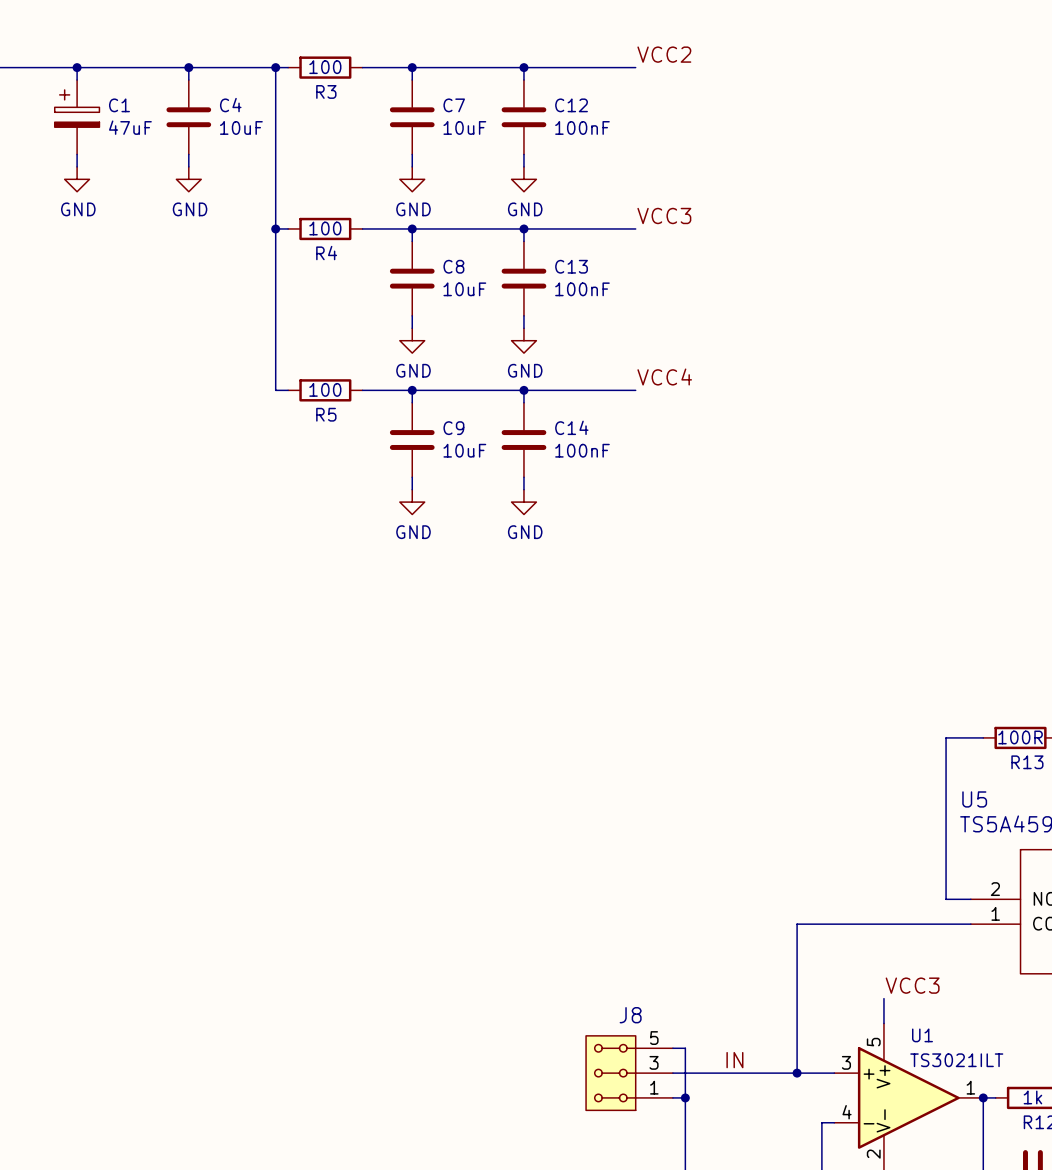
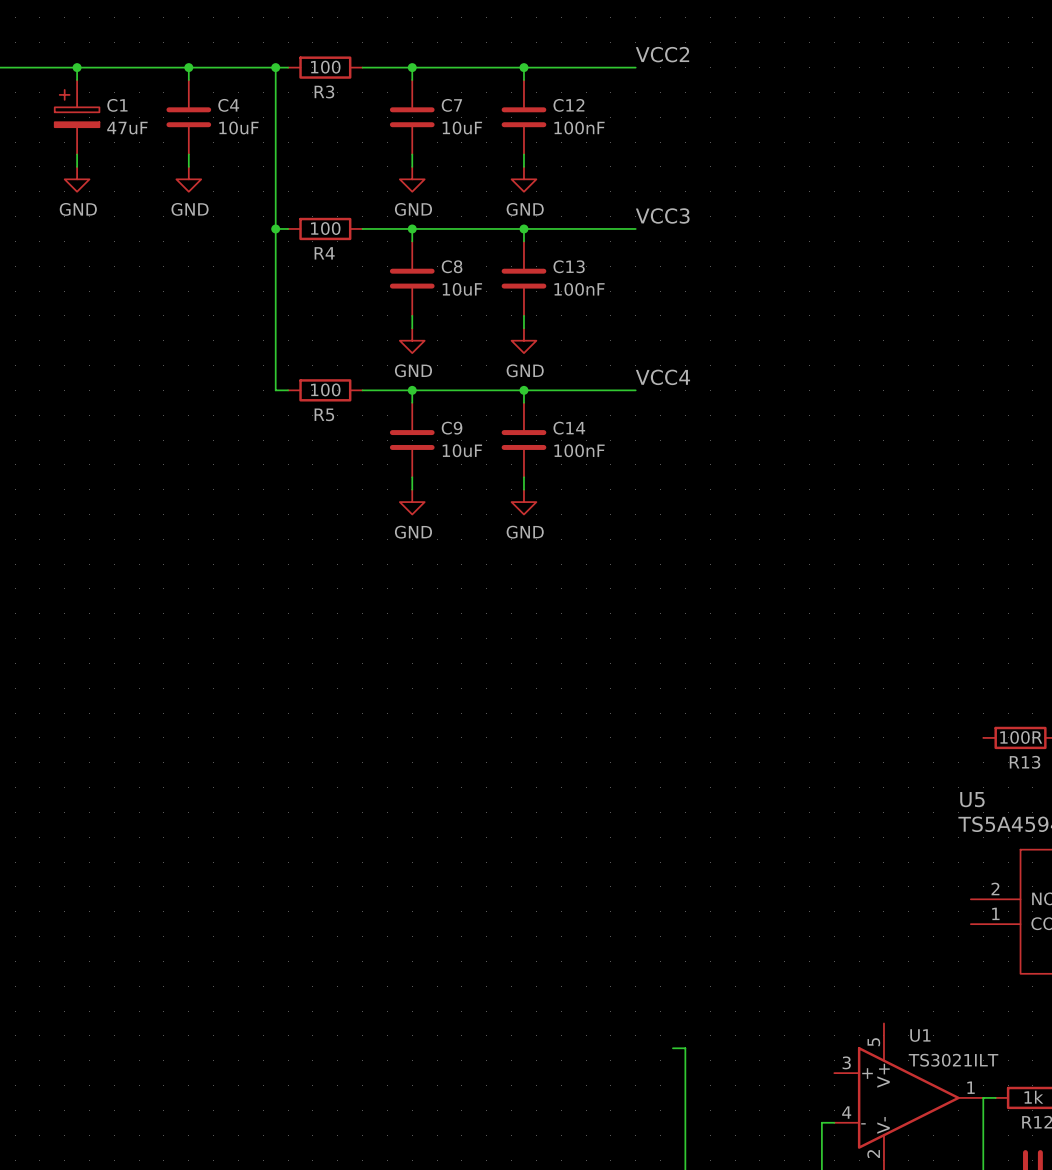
wire: (983, 737) (946, 737) (946, 899) (970, 899) -> none
wire: (970, 924) (797, 924) (797, 1073) -> none
label: VCC3 (912, 985) -> none
wire: (883, 998) (883, 1023) -> none
label: IN (734, 1060) -> none
J8: (629, 1073) -> none
wire: (672, 1073) (834, 1073) -> none
junction: (797, 1073) -> none
wire: (672, 1097) (685, 1097) -> none
junction: (685, 1097) -> none
junction: (983, 1097) -> none

